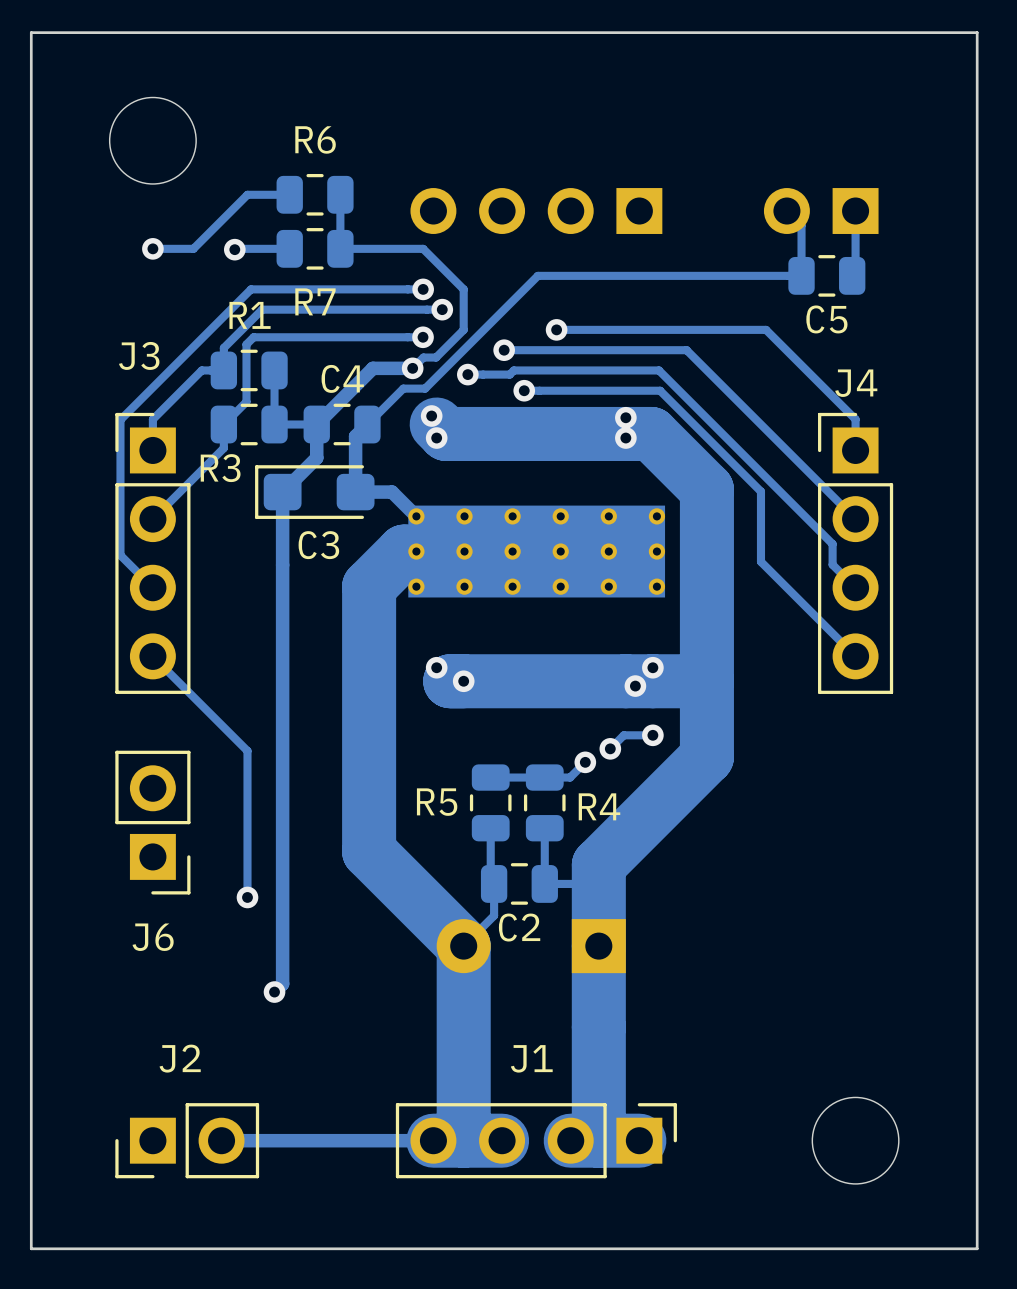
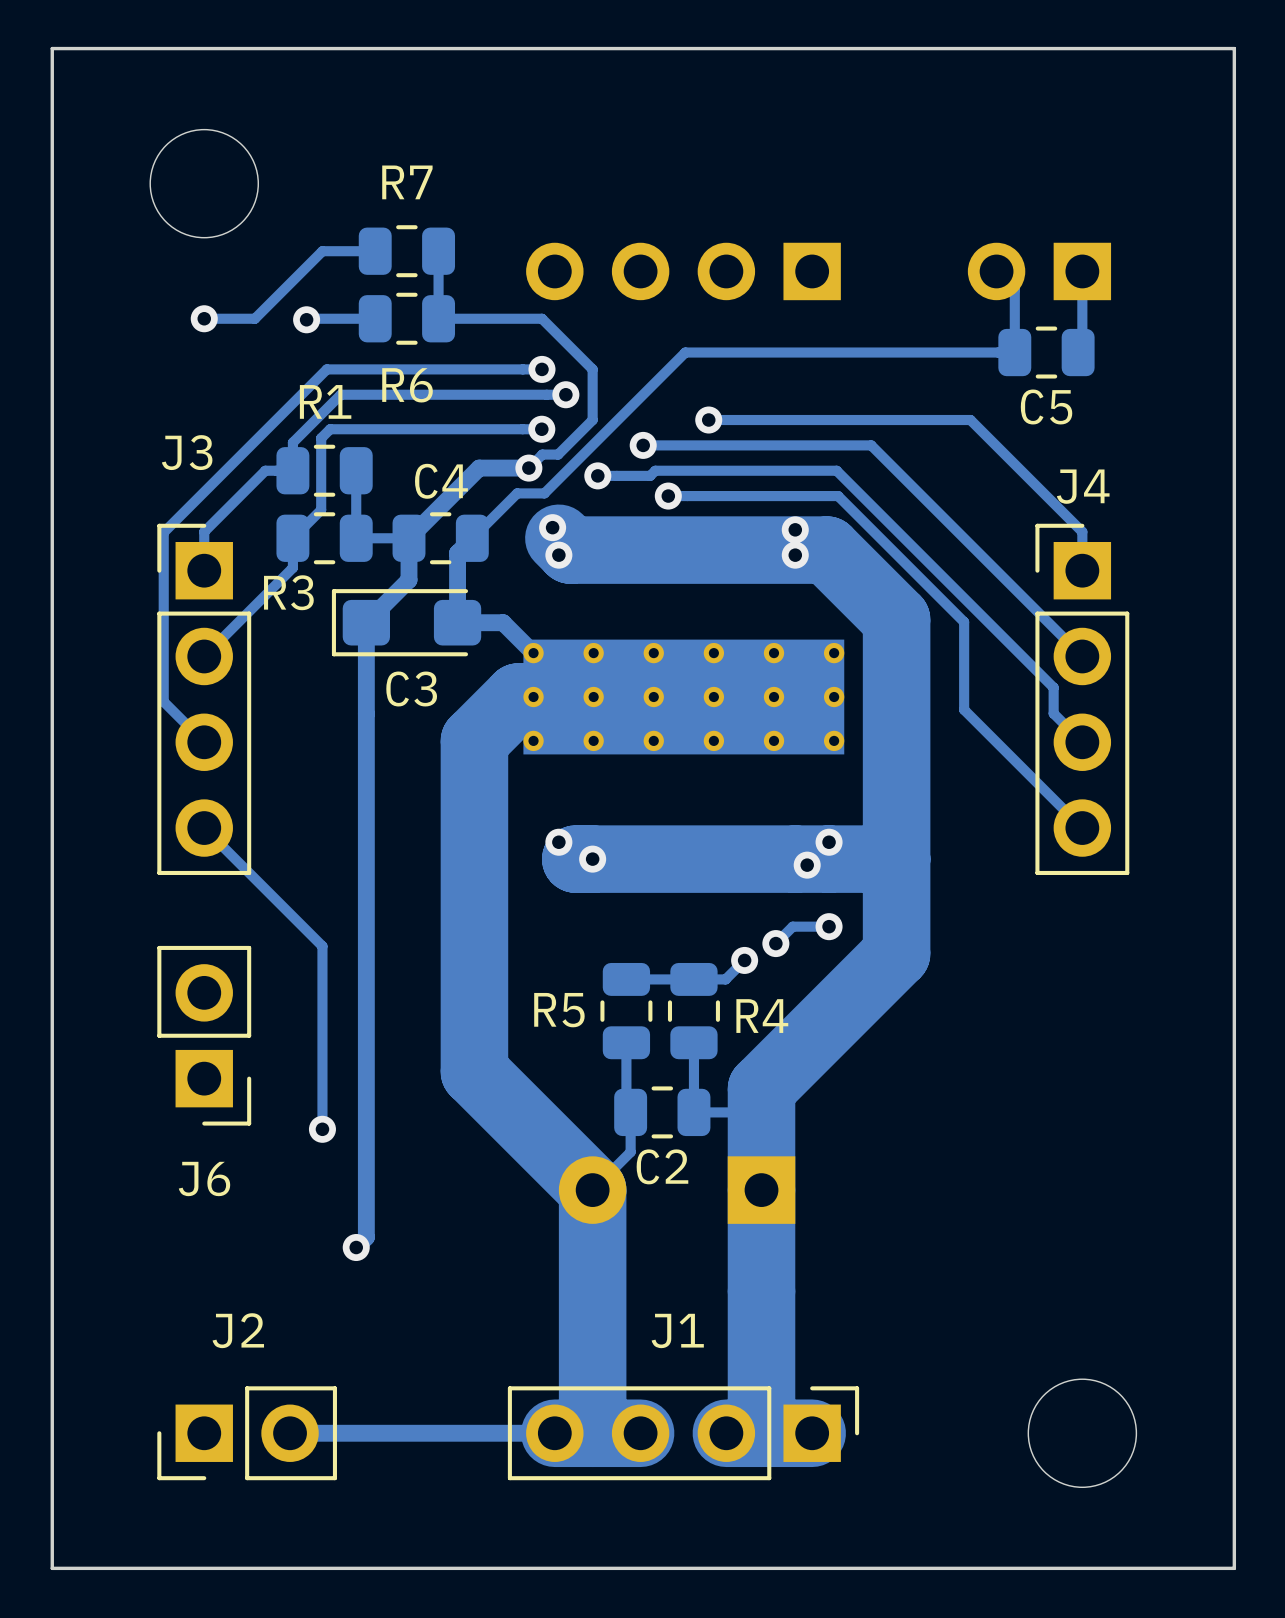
R6 name position: R6 (315, 139) -> R6 (407, 385)
R7 name position: R7 (315, 301) -> R7 (407, 182)

